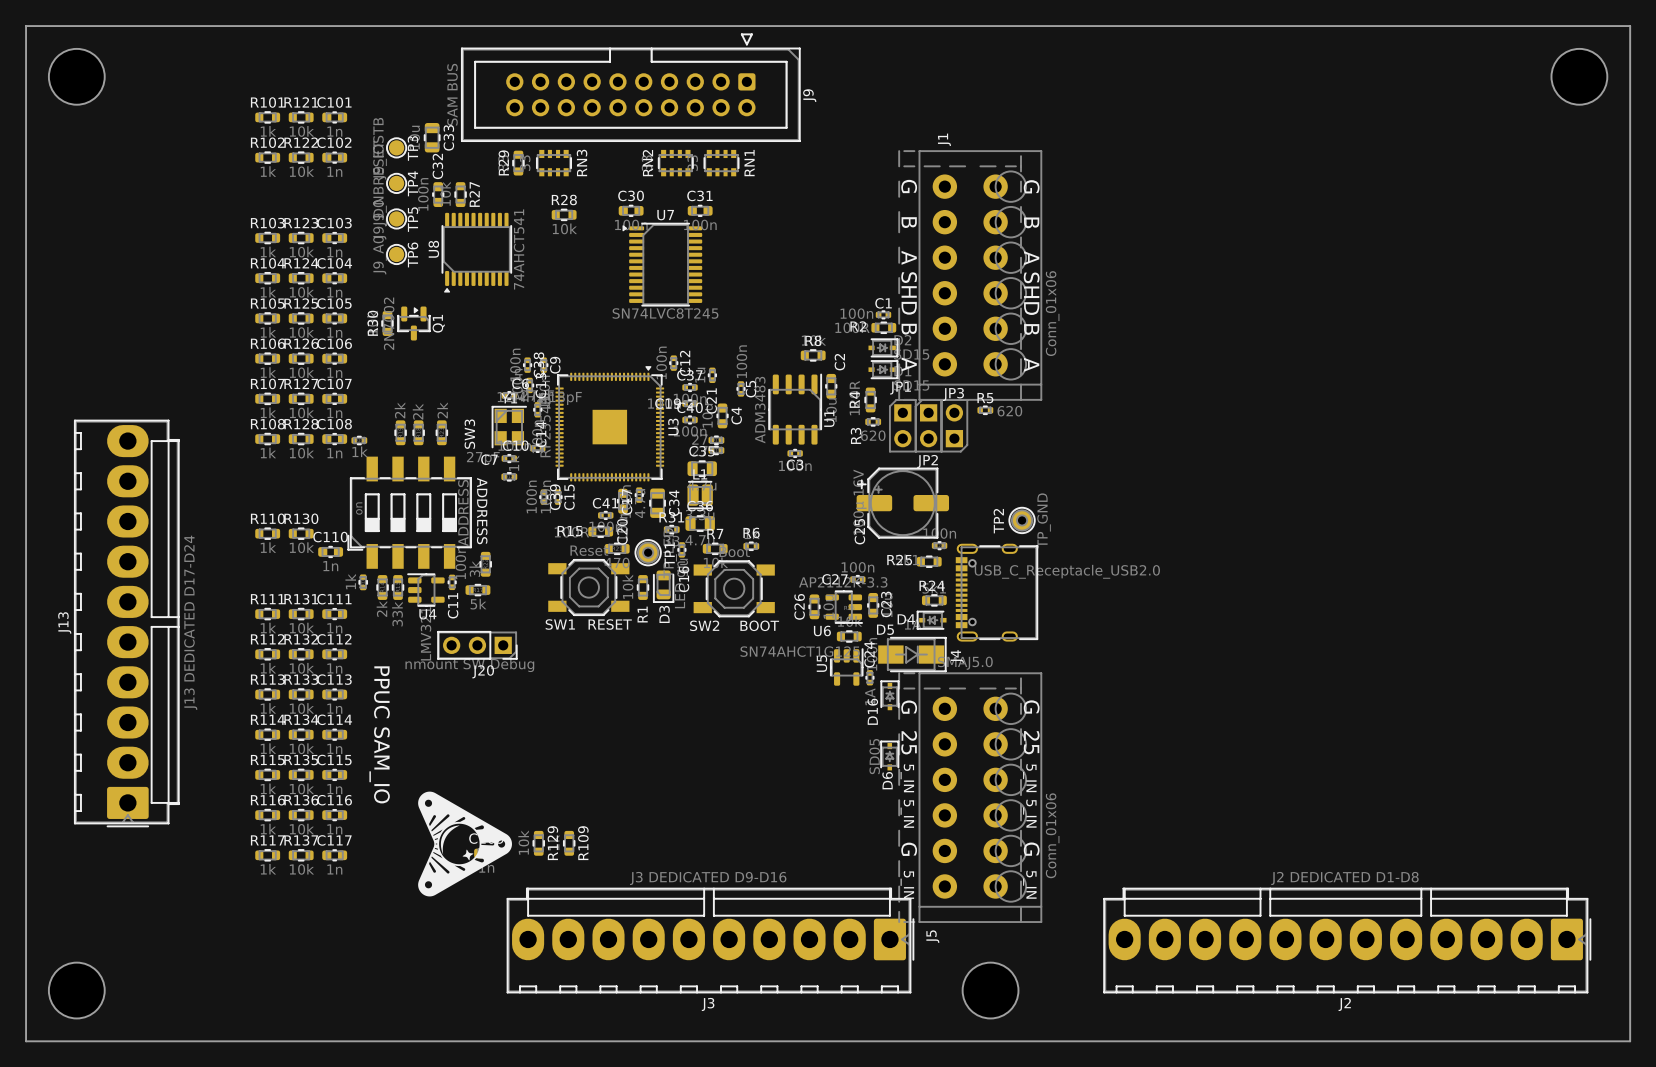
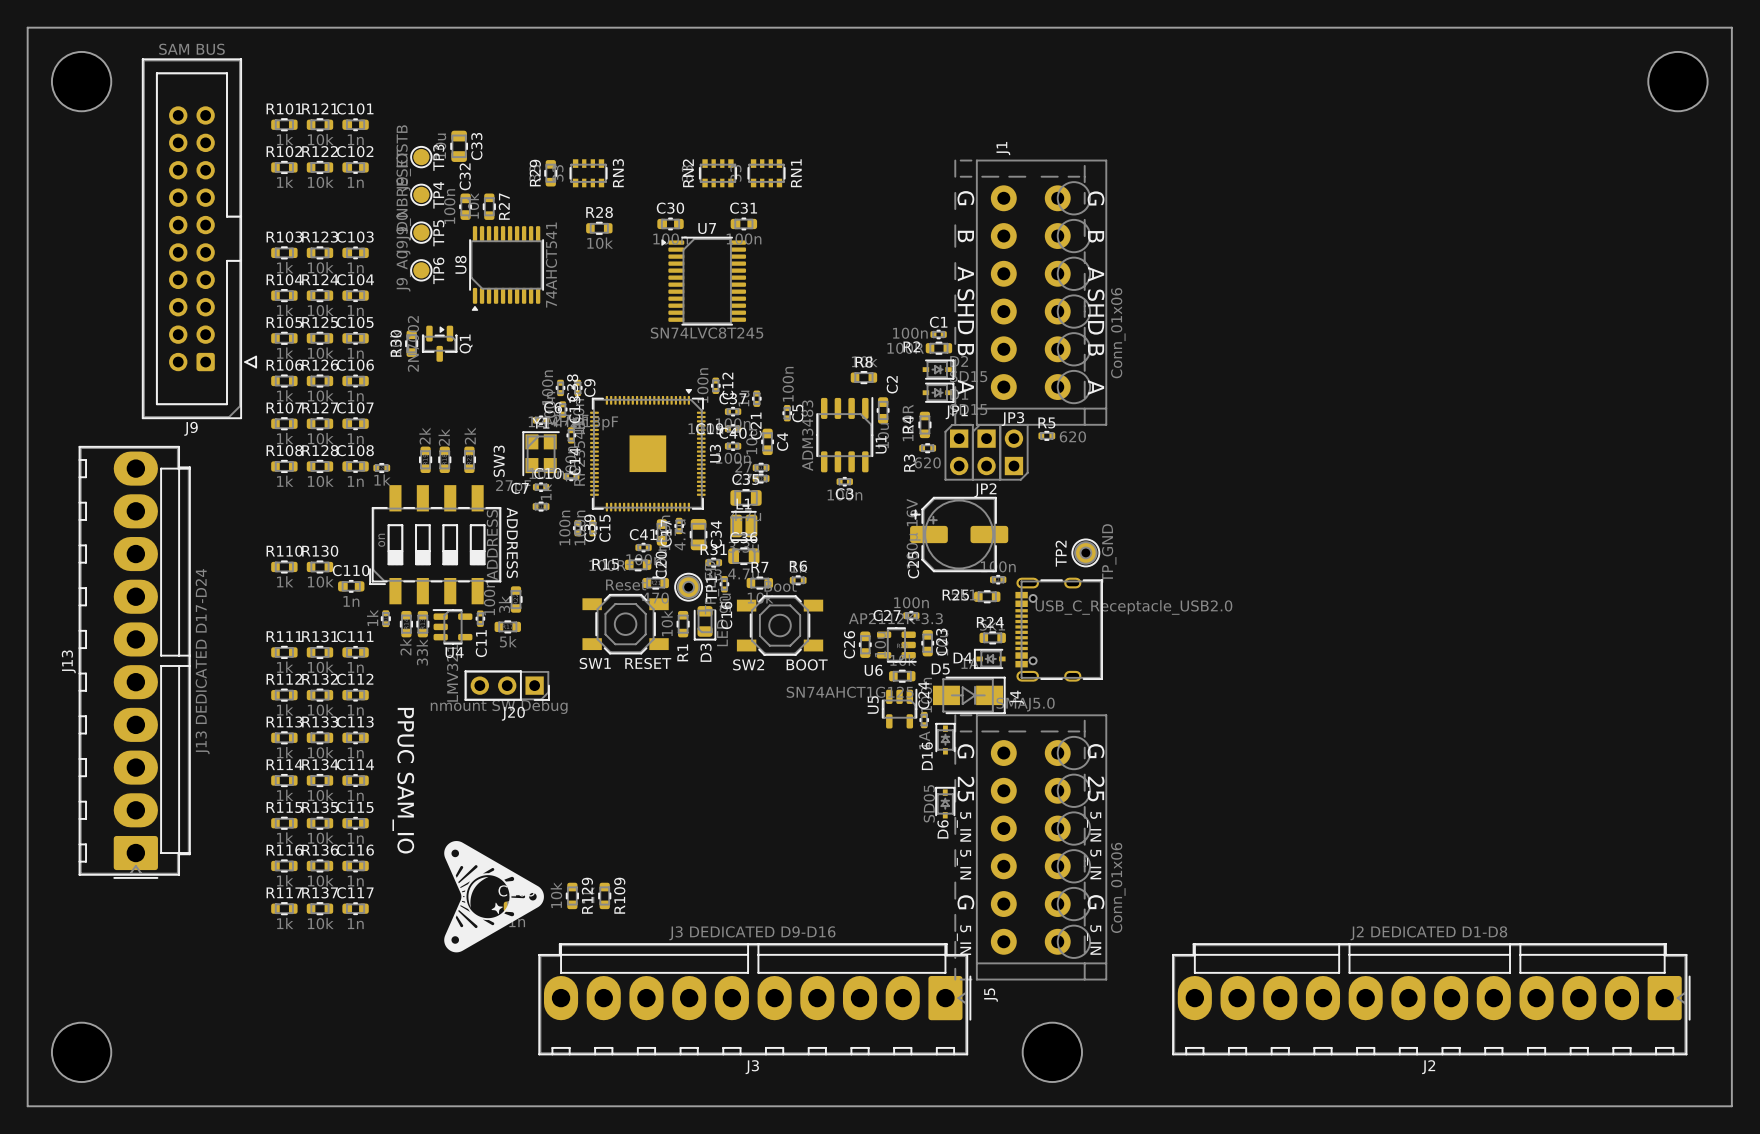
J9 rotation: 0° (630, 87) -> 90° clockwise (199, 238)
J9 position: (630, 87) -> (199, 238)

